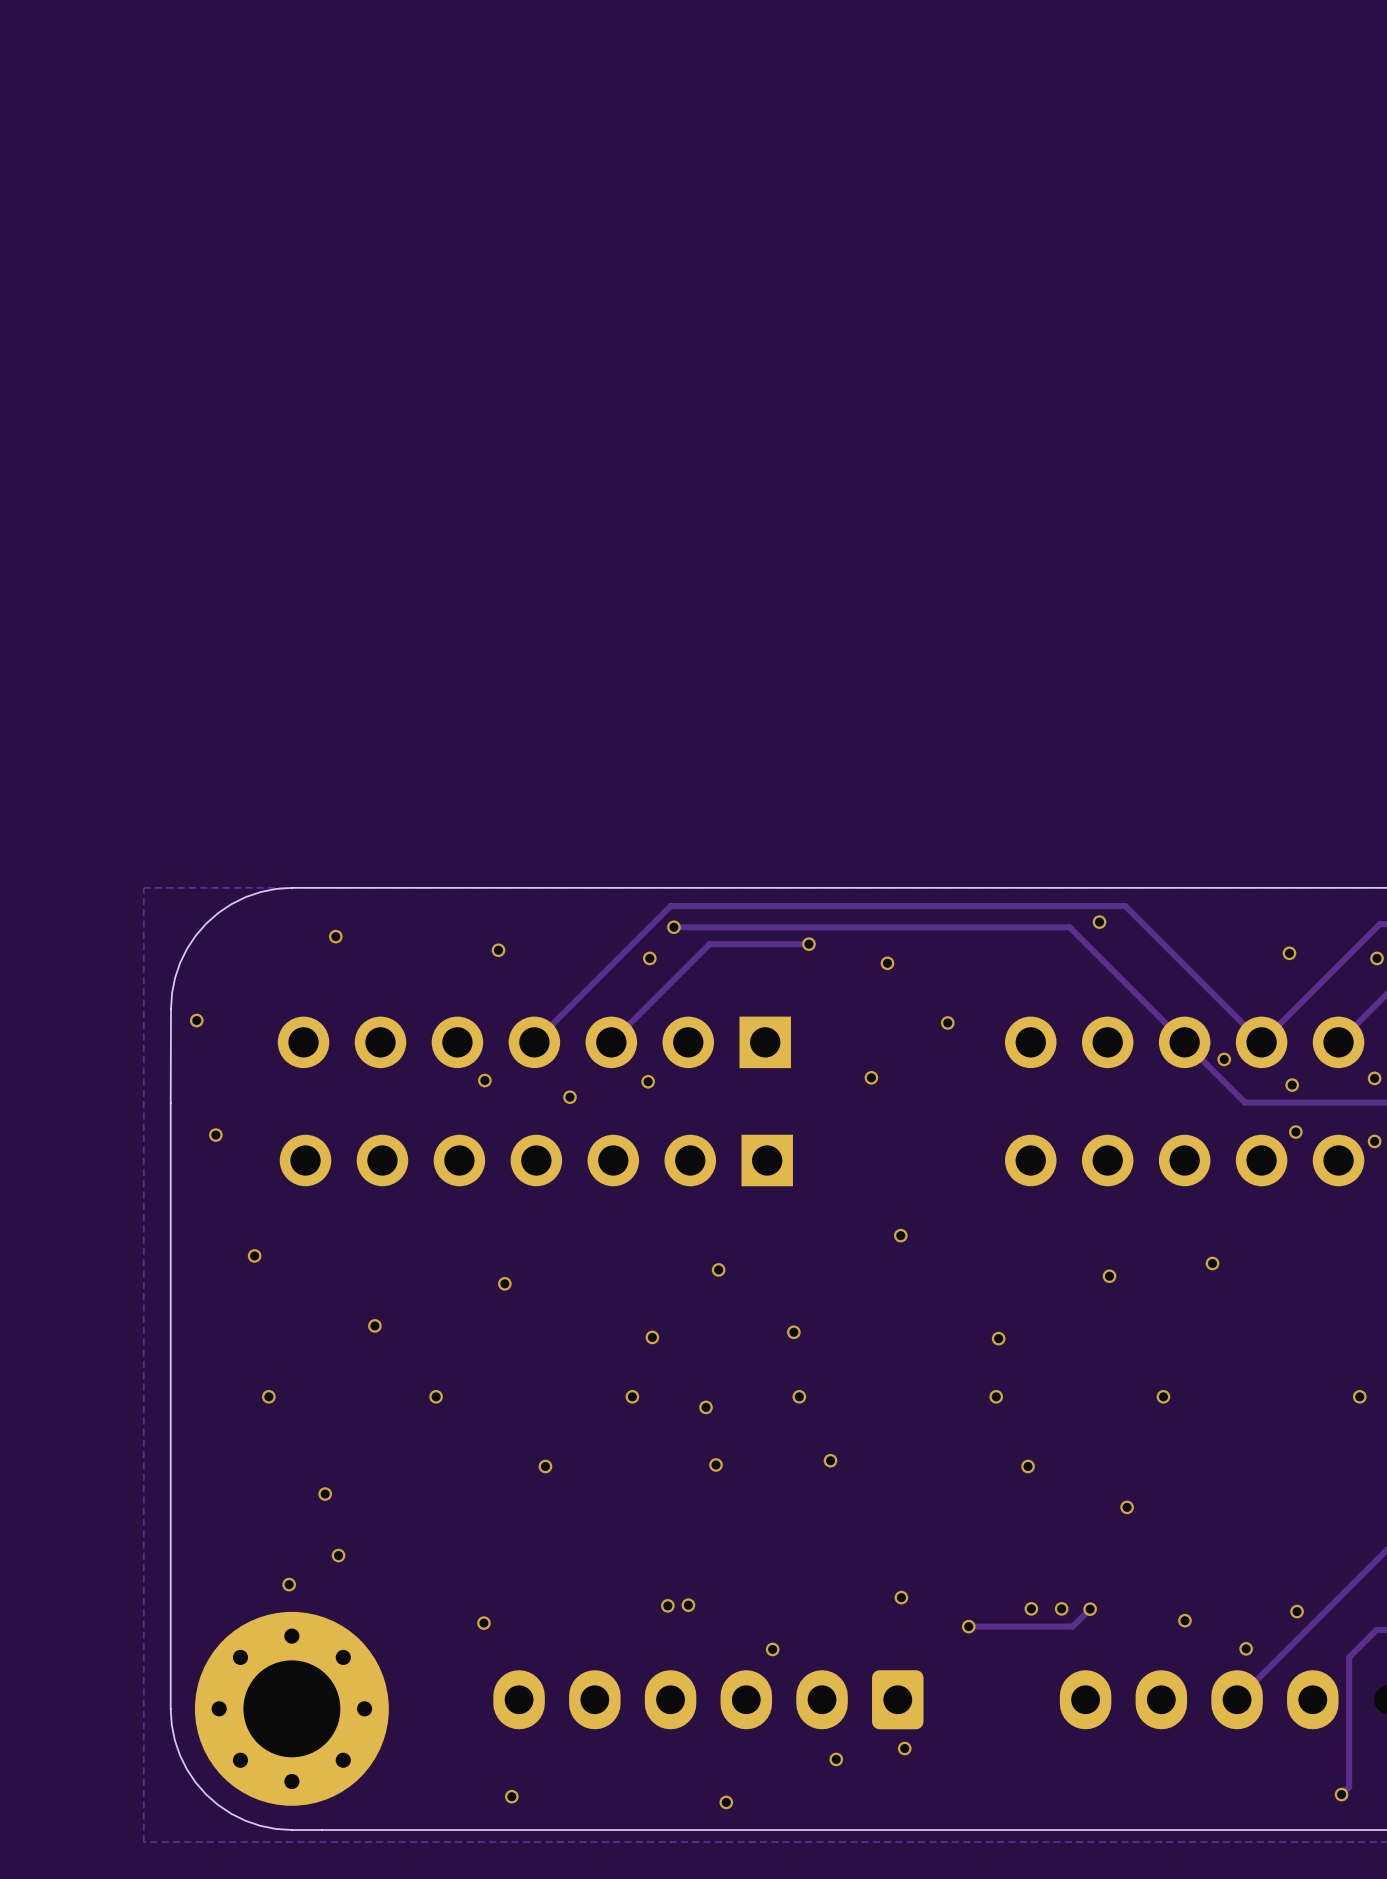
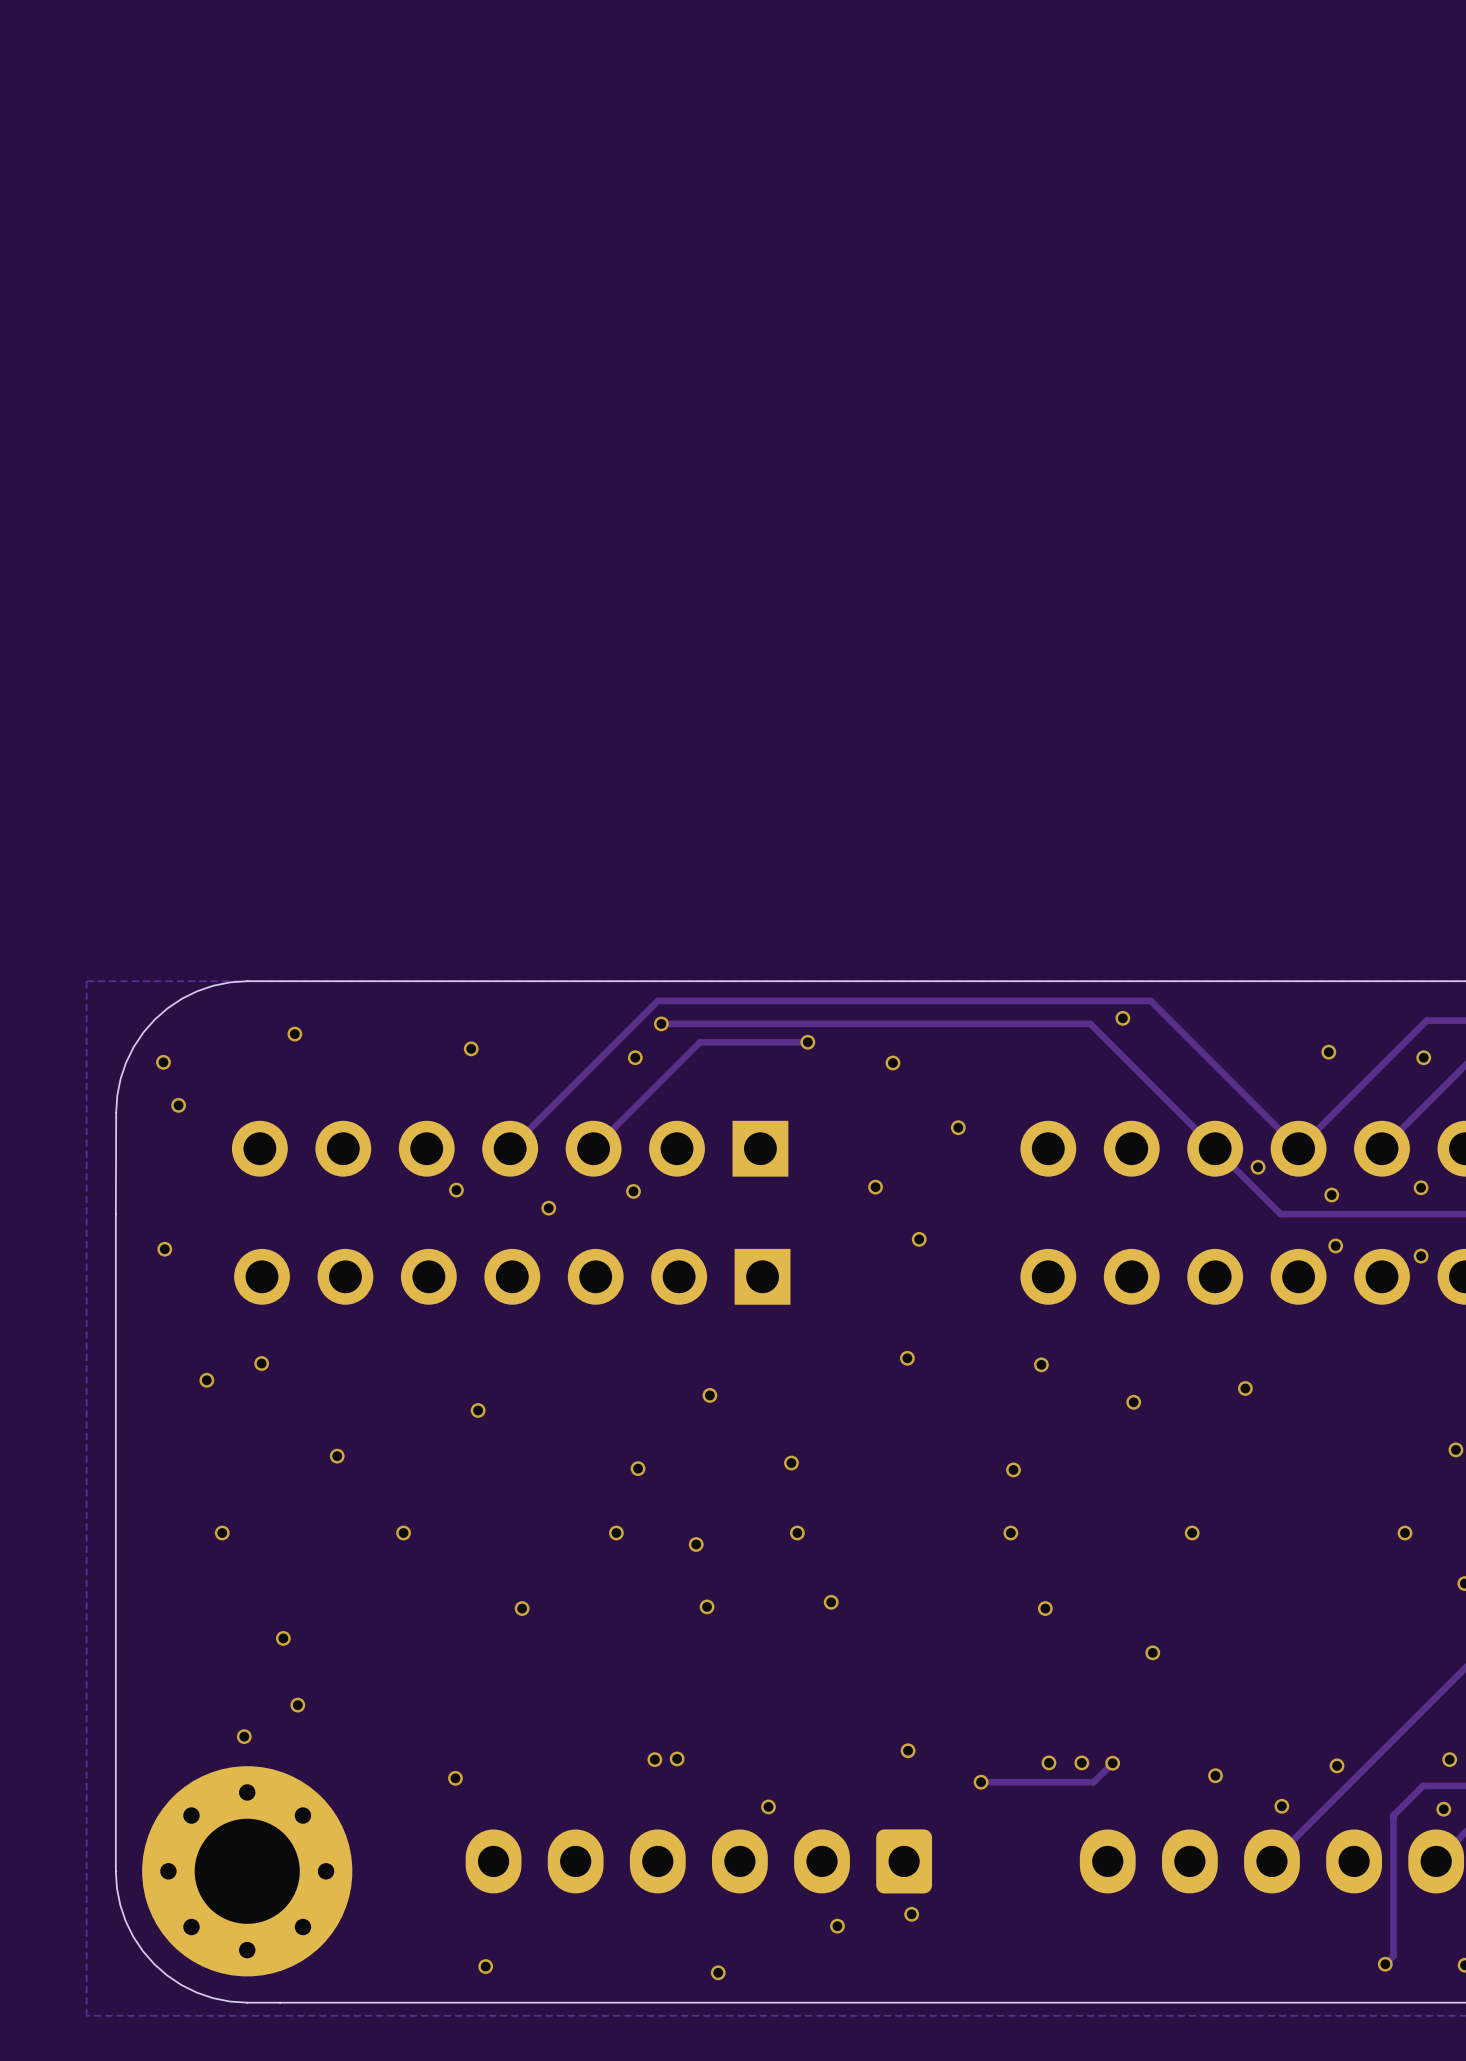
via: none -> (163, 1062)
via: none -> (178, 1105)
via: (196, 1020) -> none
via: none -> (919, 1239)
via: none -> (261, 1363)
via: none -> (1041, 1364)

